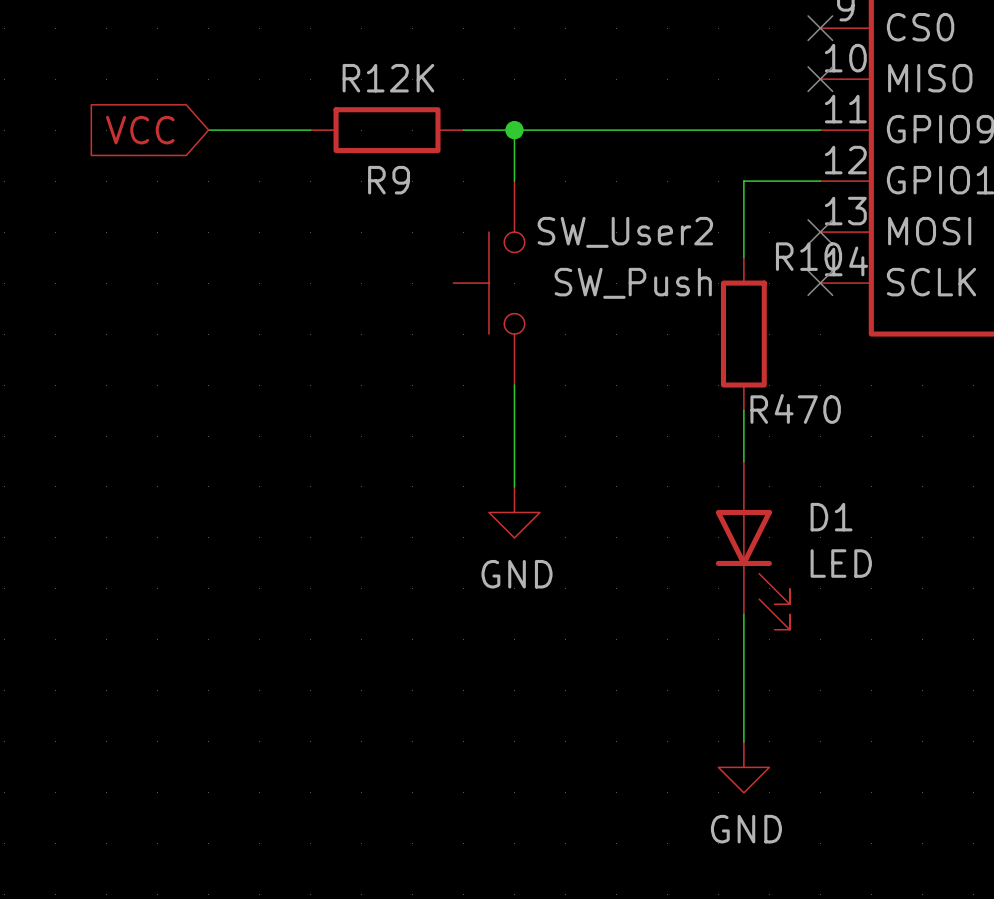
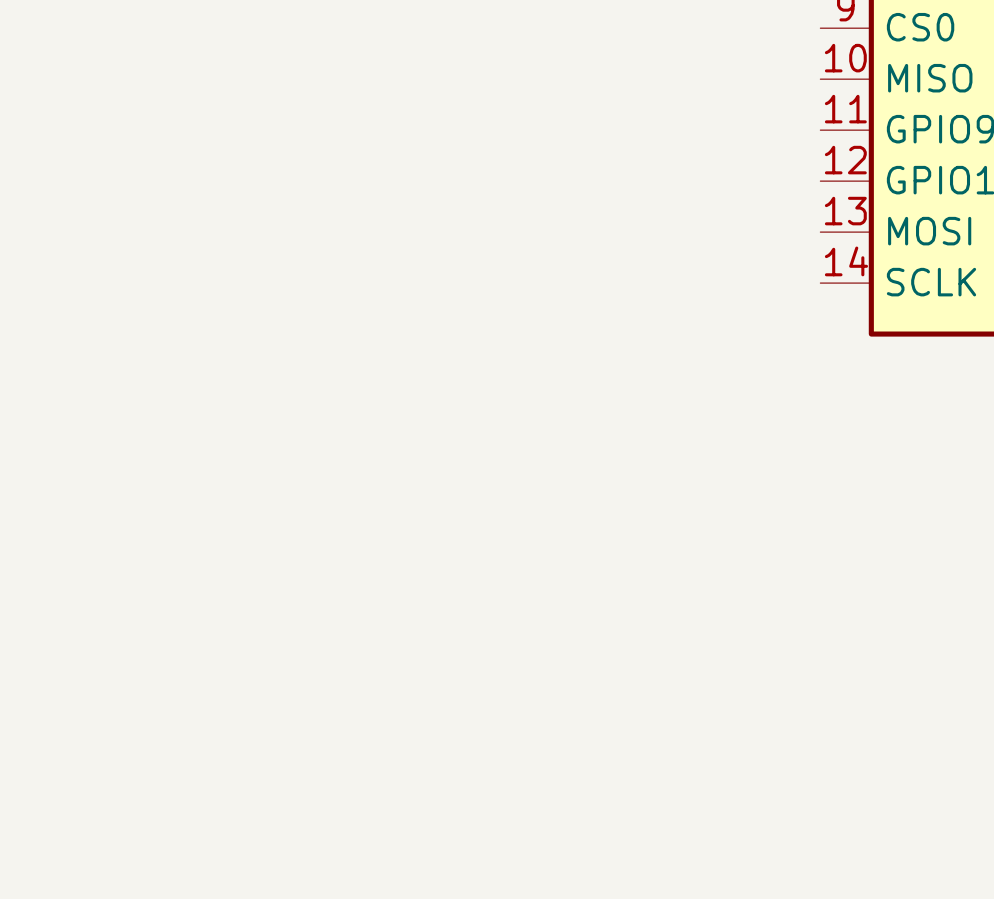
no-connect mark: (820, 28) -> none
no-connect mark: (820, 79) -> none
global label: VCC (140, 130) -> none
wire: (208, 130) (310, 130) -> none
R9: R12K (387, 130) -> none
wire: (463, 130) (820, 130) -> none
wire: (514, 130) (514, 181) -> none
junction: (514, 130) -> none
wire: (820, 181) (743, 181) (743, 257) -> none
no-connect mark: (820, 232) -> none
SW_User2: SW_Push (488, 283) -> none
no-connect mark: (820, 283) -> none
R10: R470 (743, 334) -> none
wire: (514, 385) (514, 486) -> none
wire: (743, 410) (743, 461) -> none
power symbol: GND (514, 512) -> none
D1: LED (752, 545) -> none
wire: (743, 614) (743, 741) -> none
power symbol: GND (743, 767) -> none

